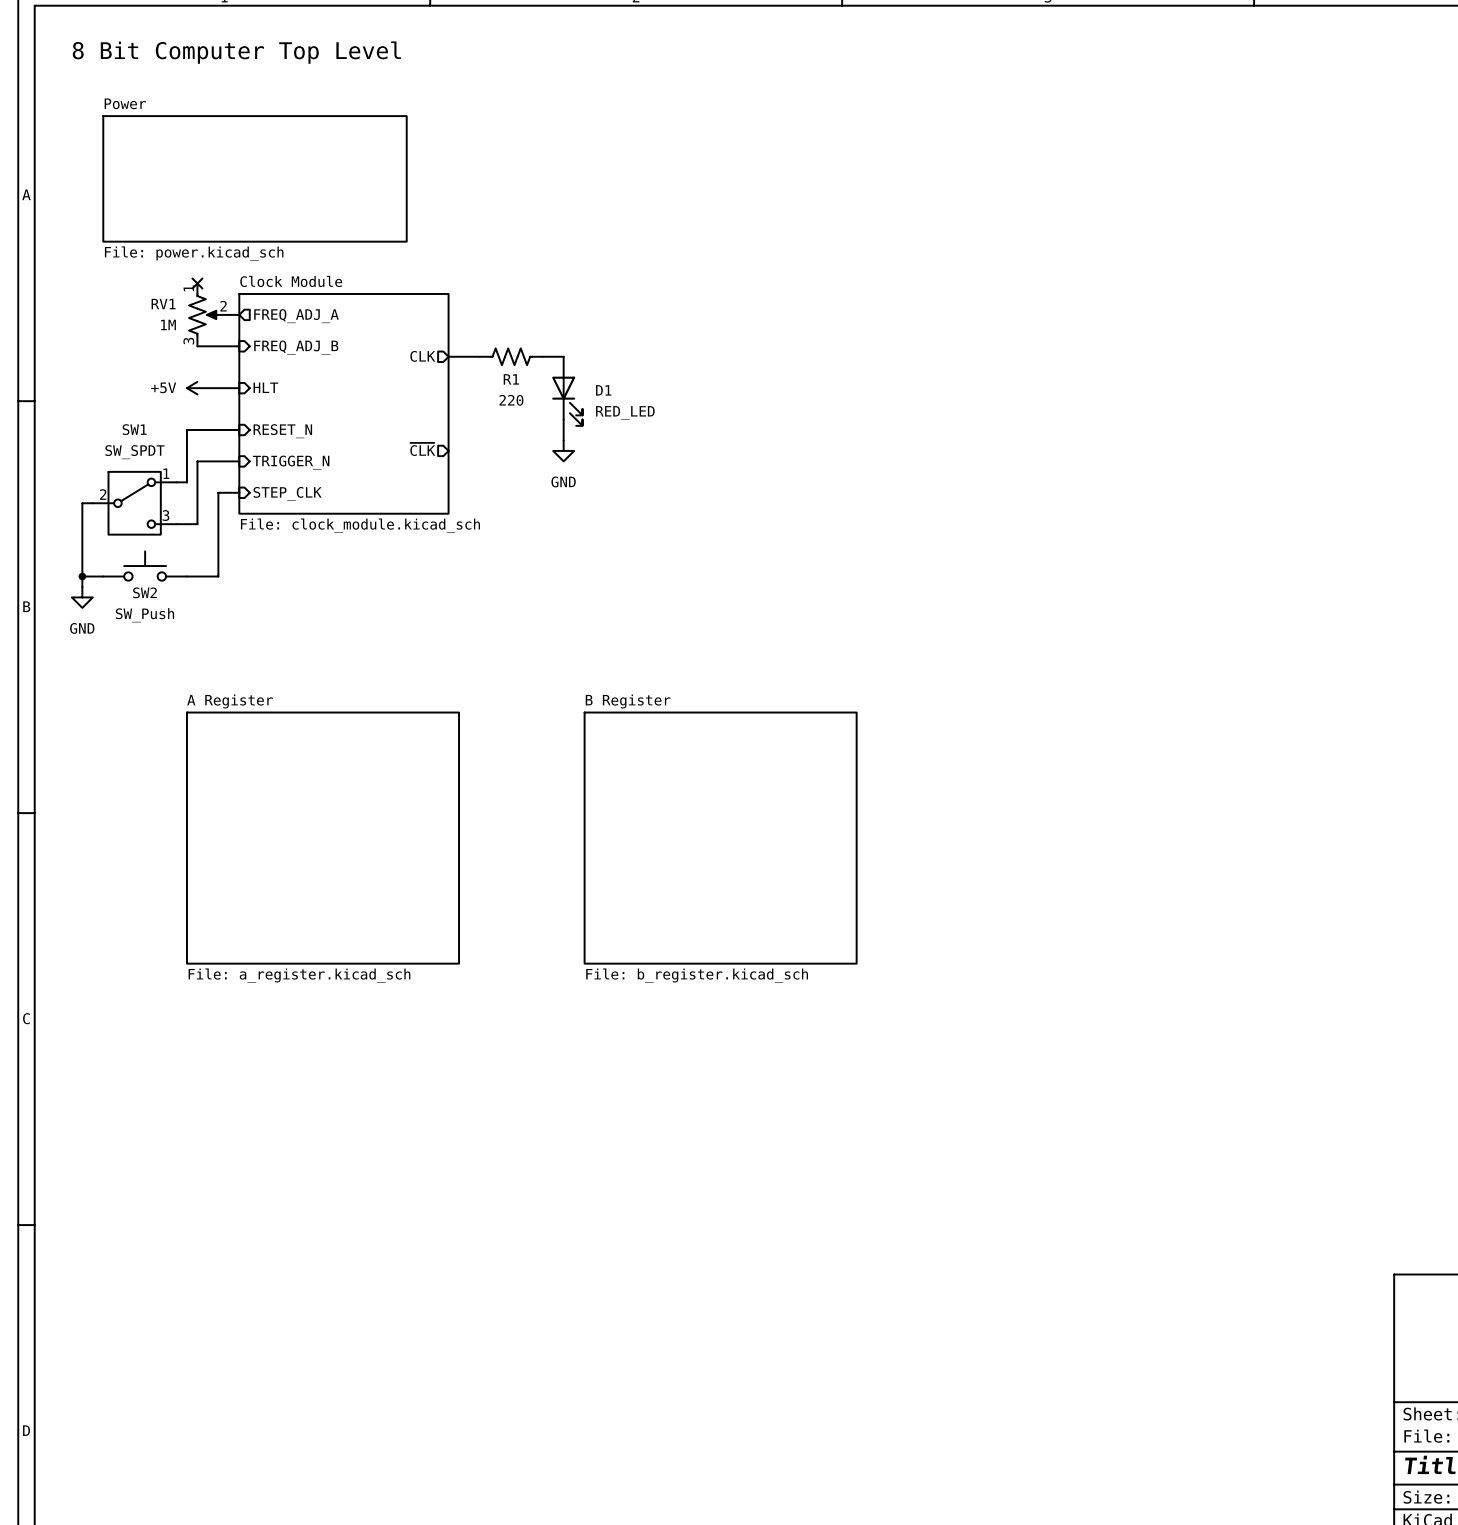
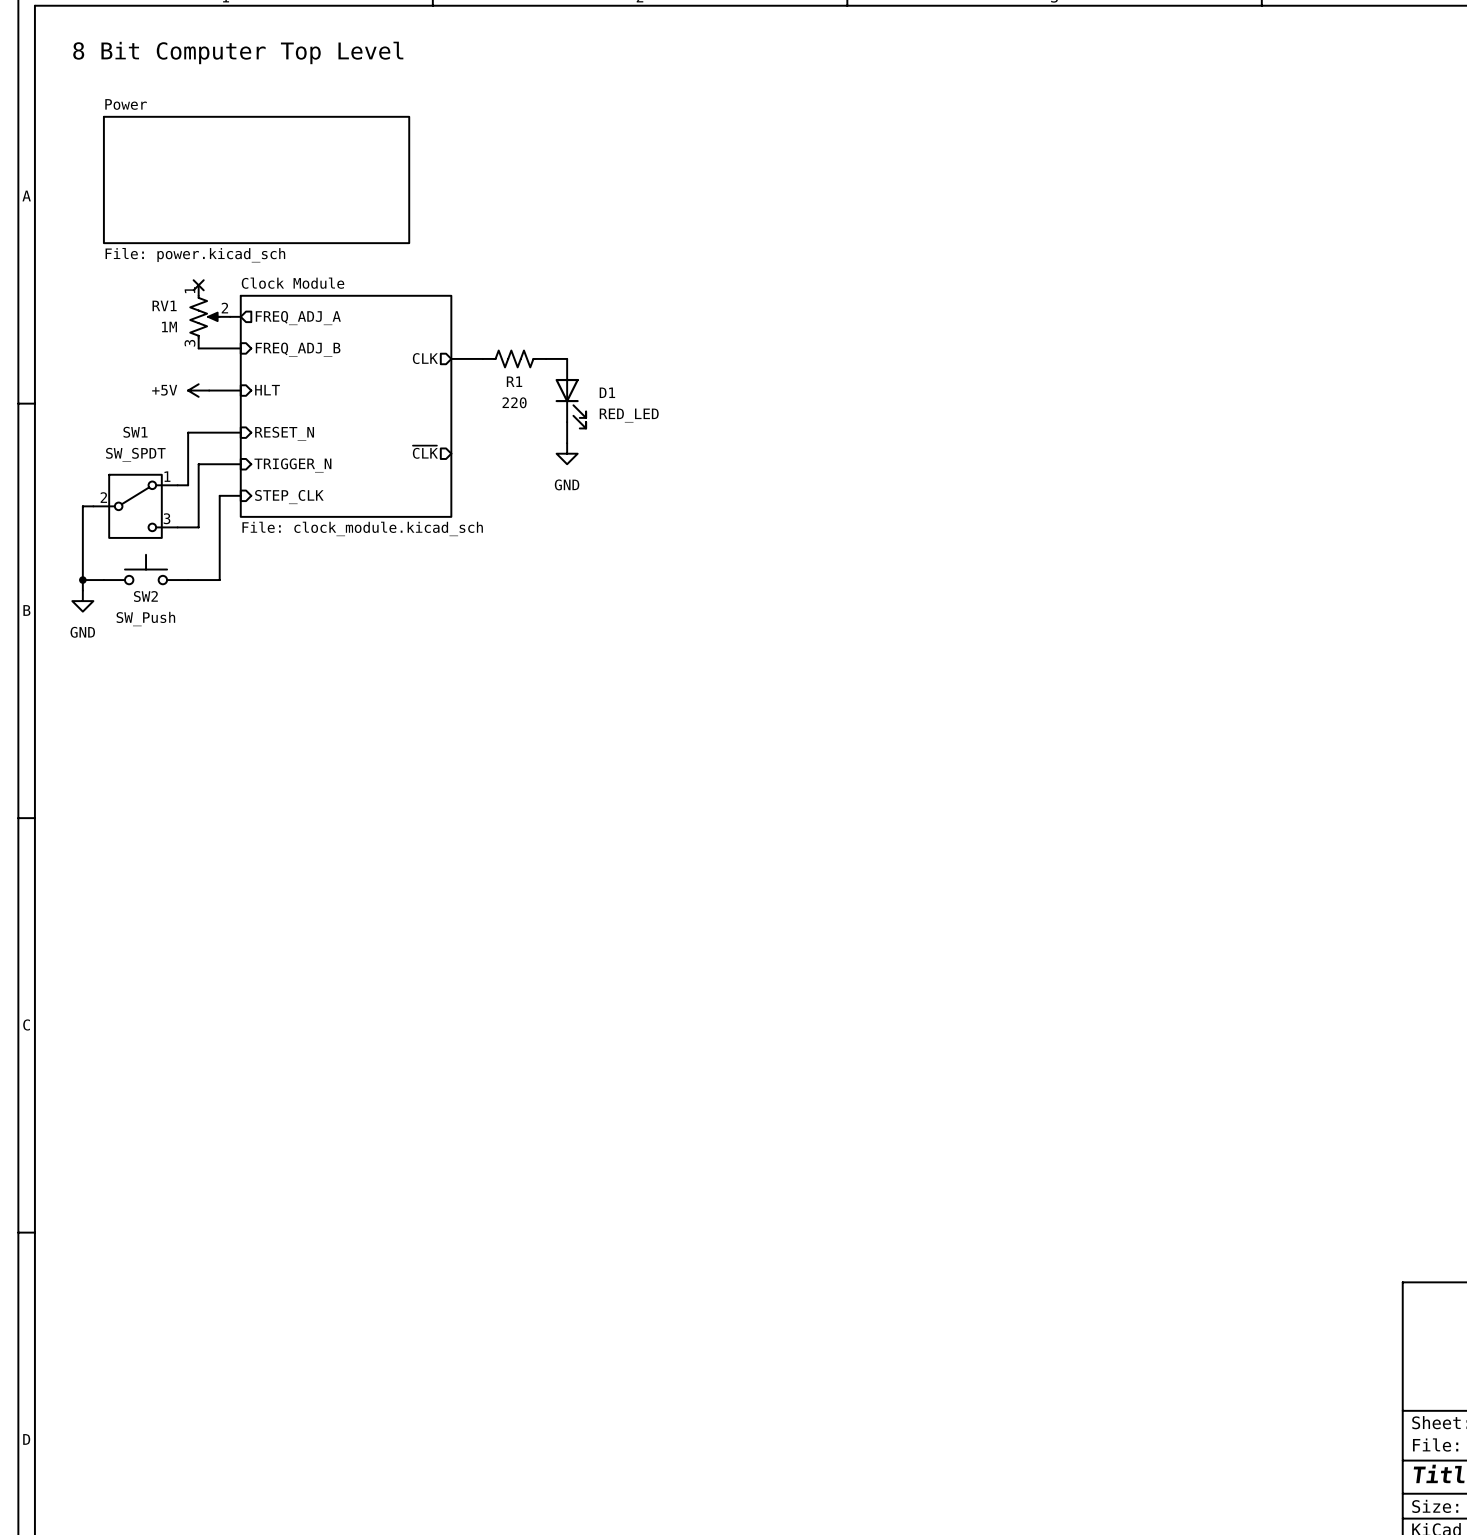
sheet A Register: File: a_register.kicad_sch (323, 838) -> none
sheet B Register: File: b_register.kicad_sch (720, 838) -> none

